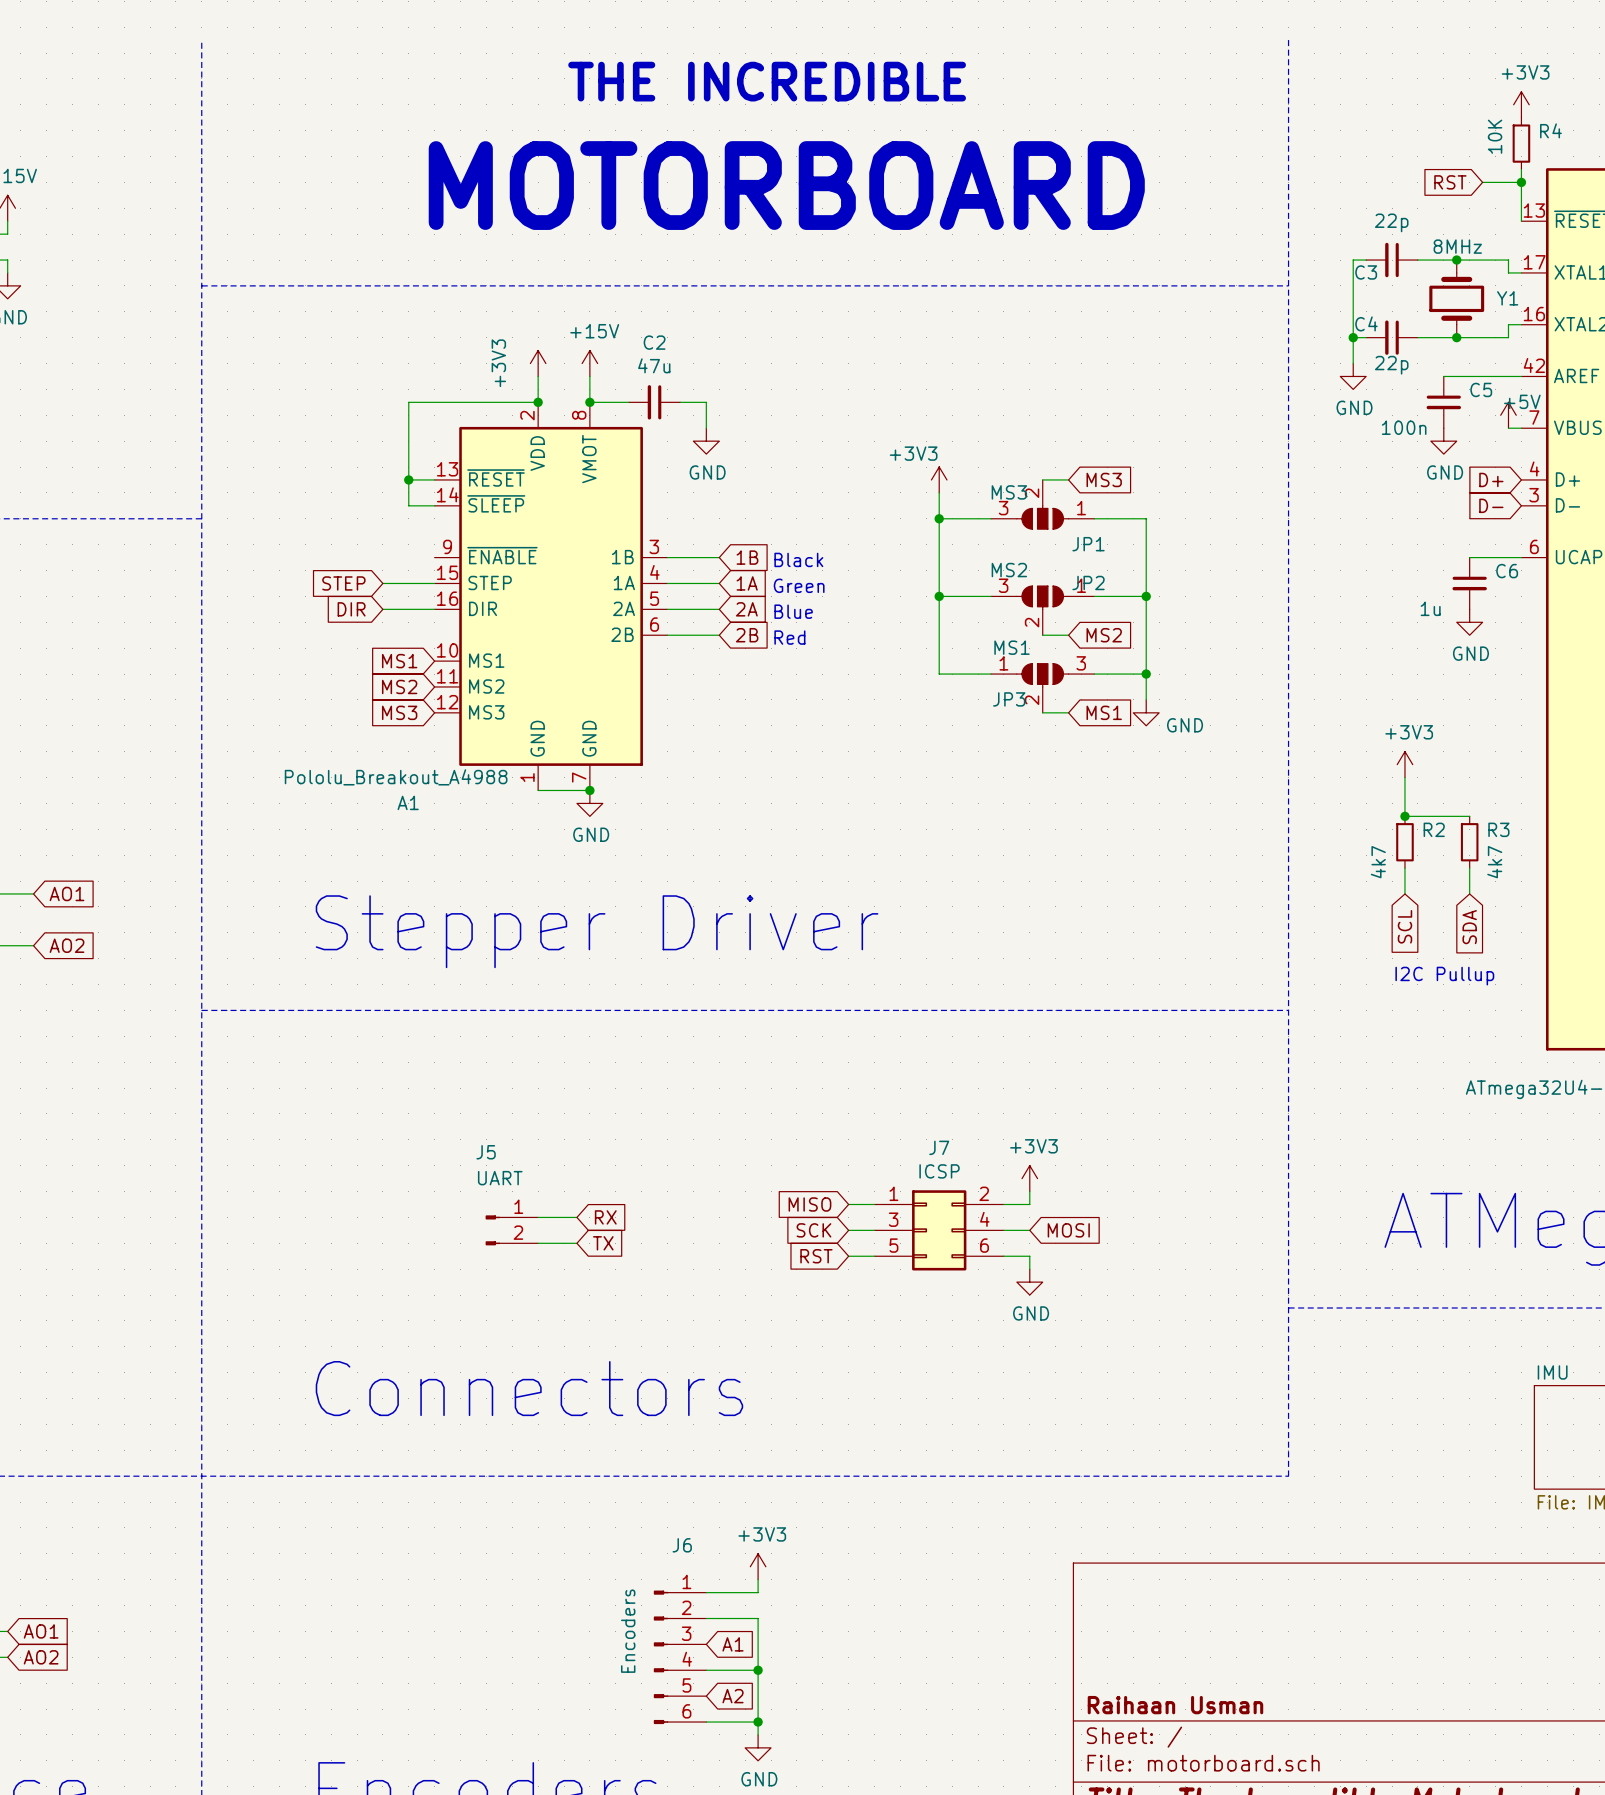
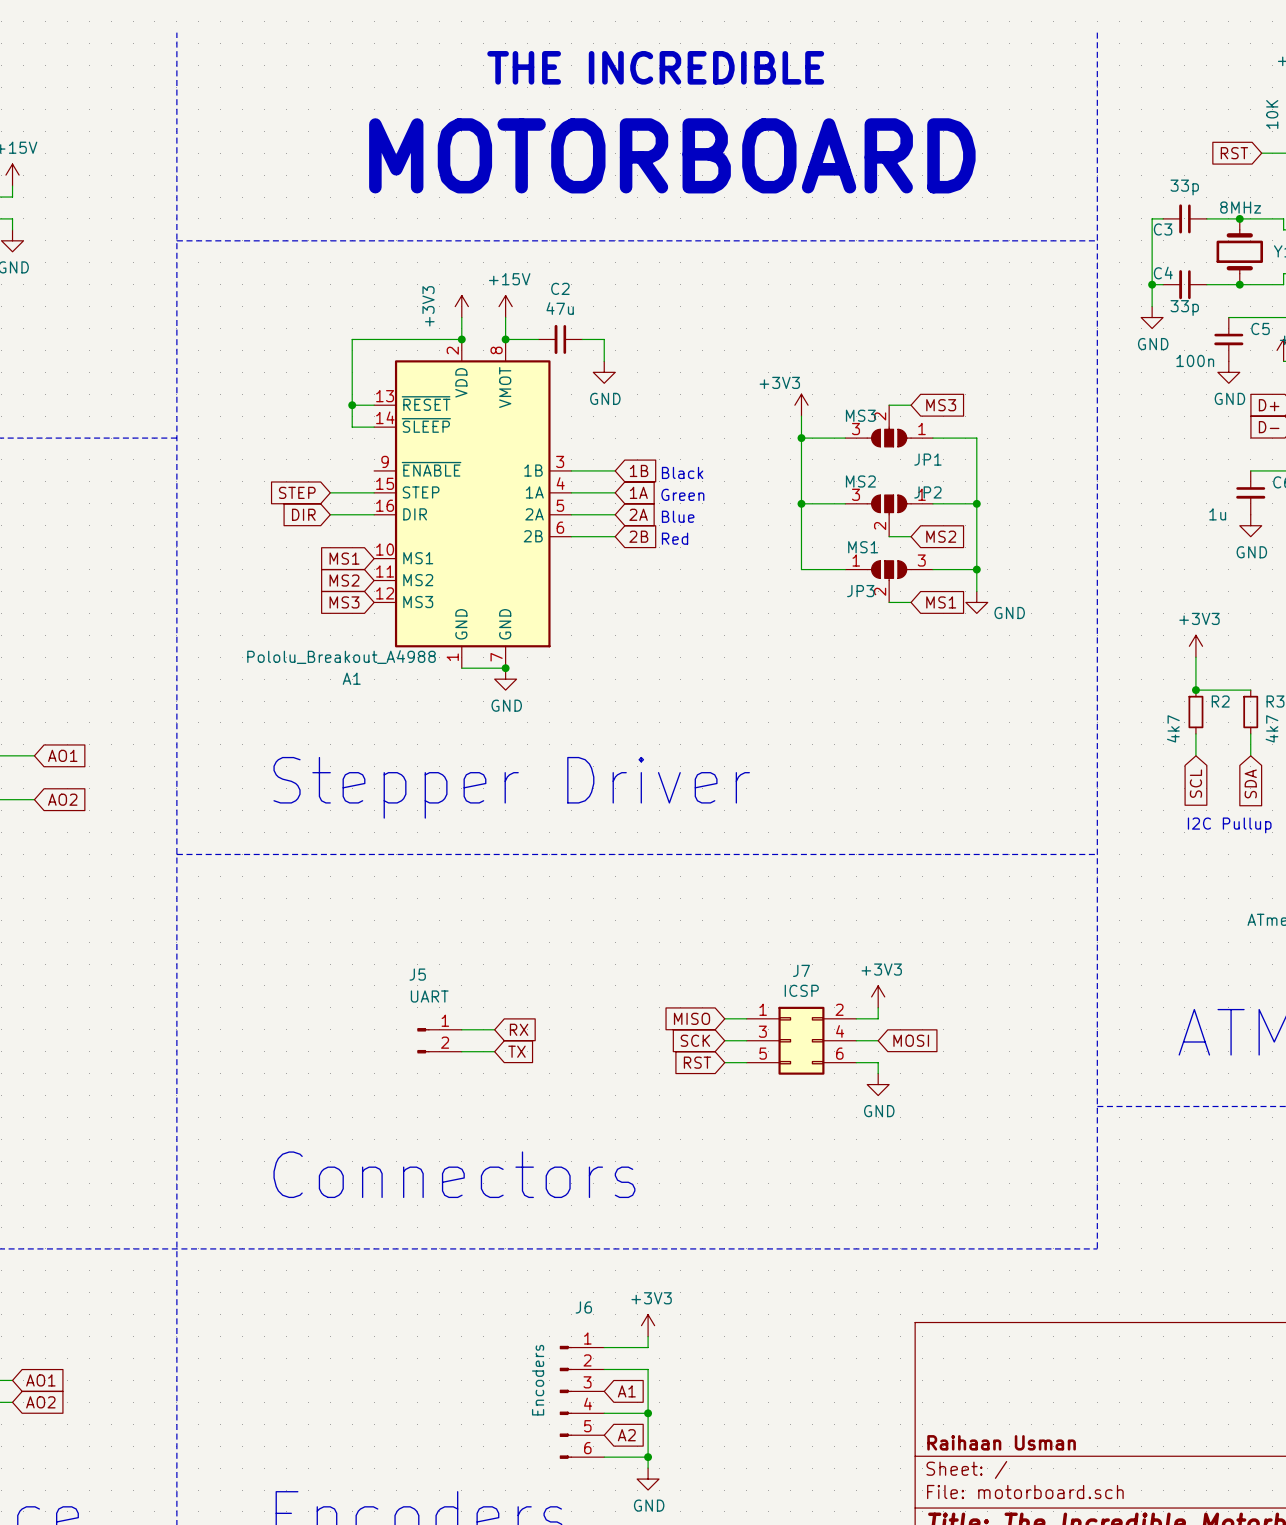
C3 value: 22p (1391, 222) -> 33p (1184, 187)
C4 value: 22p (1391, 365) -> 33p (1184, 308)

